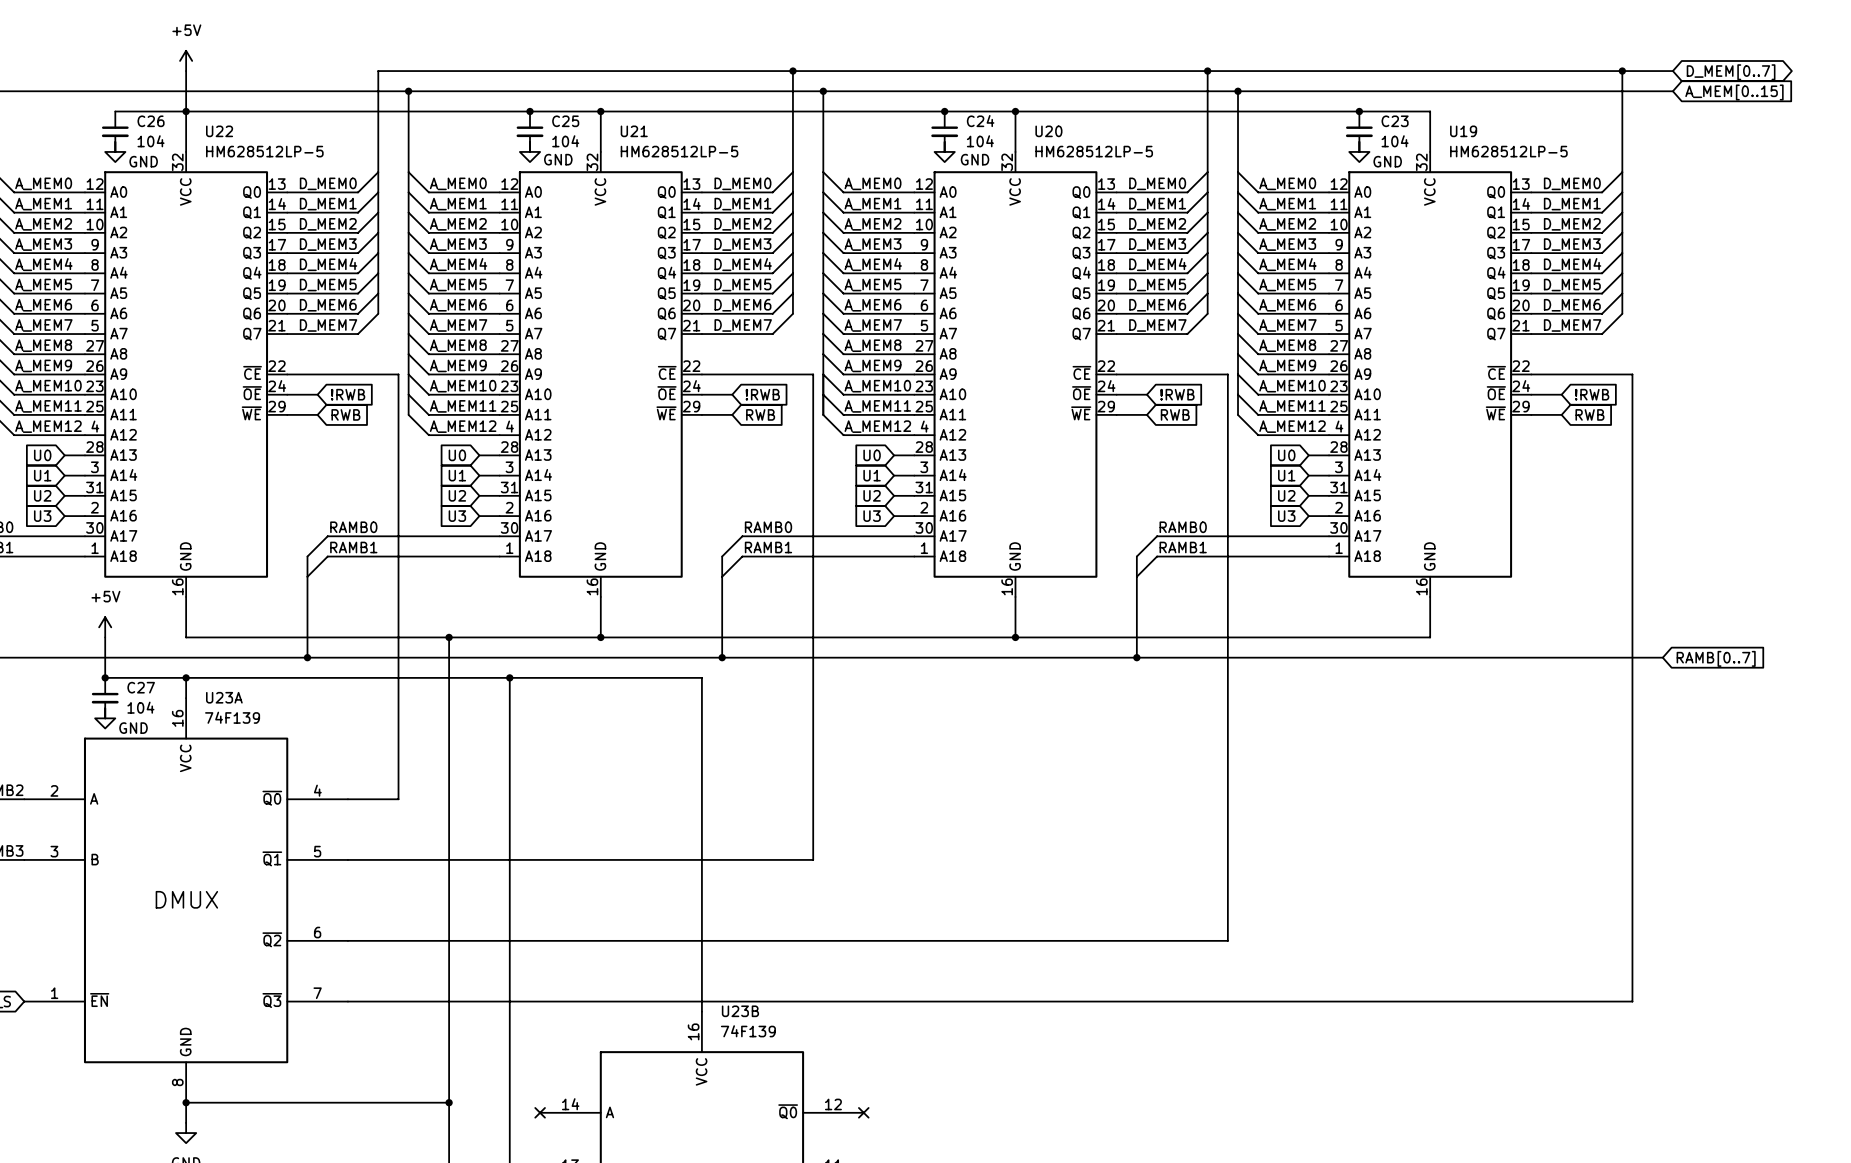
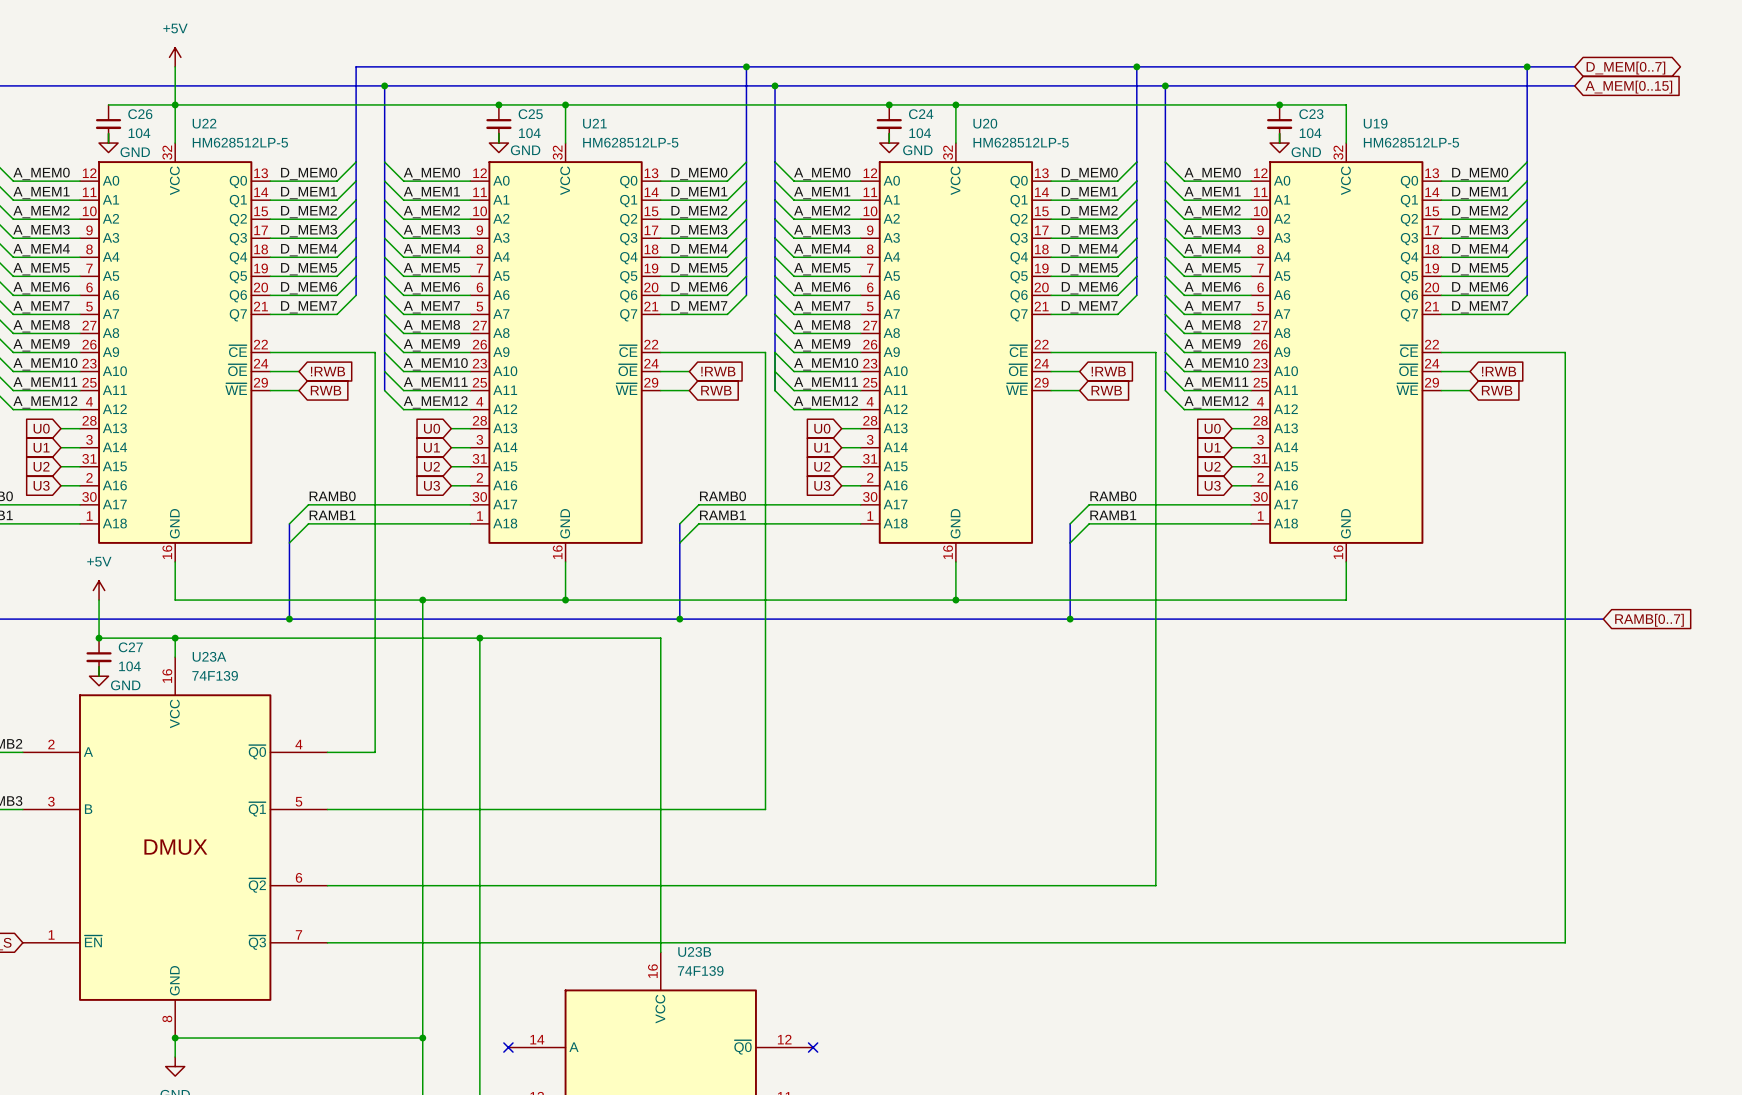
wire: (1632, 374) (1632, 1001) -> (1536, 352) (1565, 352) (1565, 942) (1536, 942)
bus: none -> (1565, 619) (1603, 619)
global label position: RAMB[0..7] (1716, 658) -> RAMB[0..7] (1649, 620)

